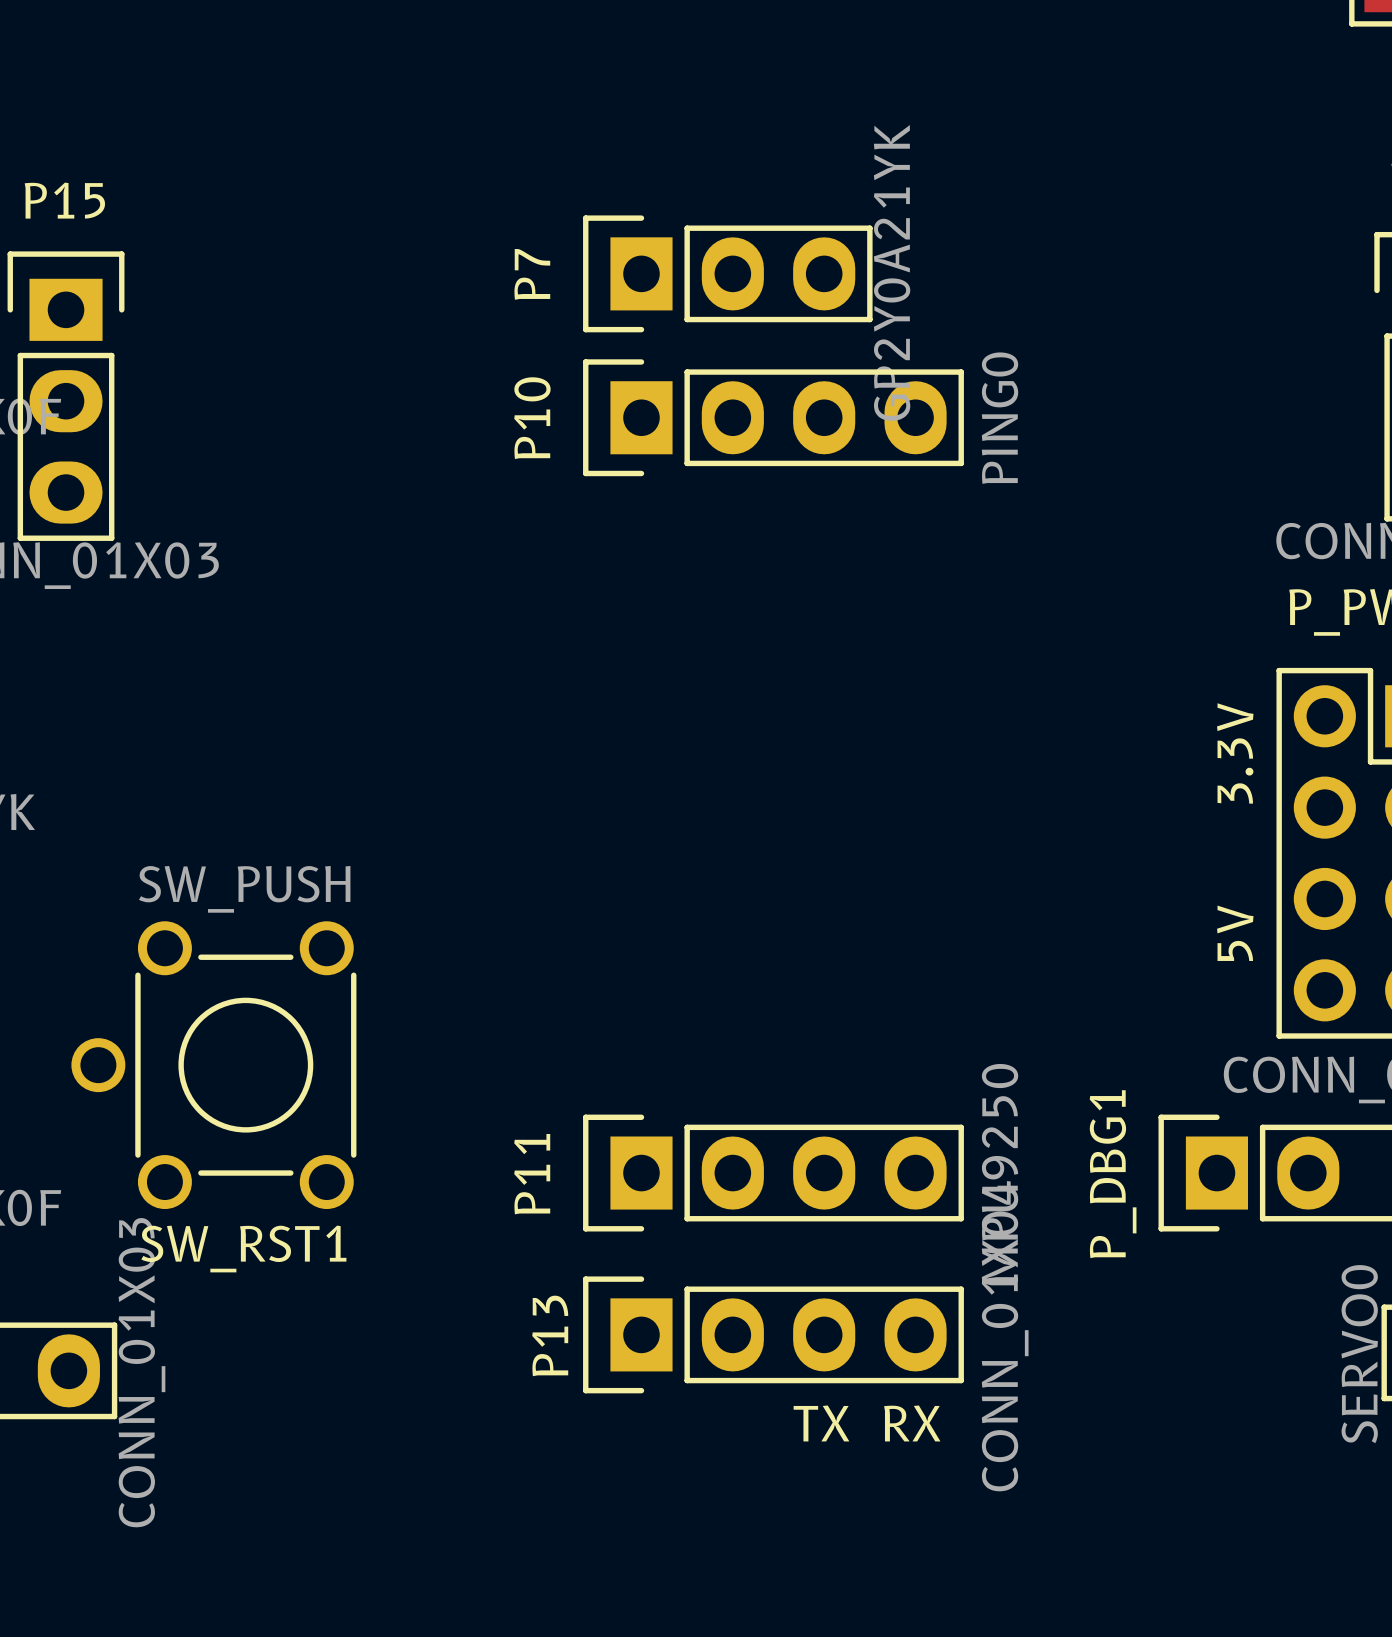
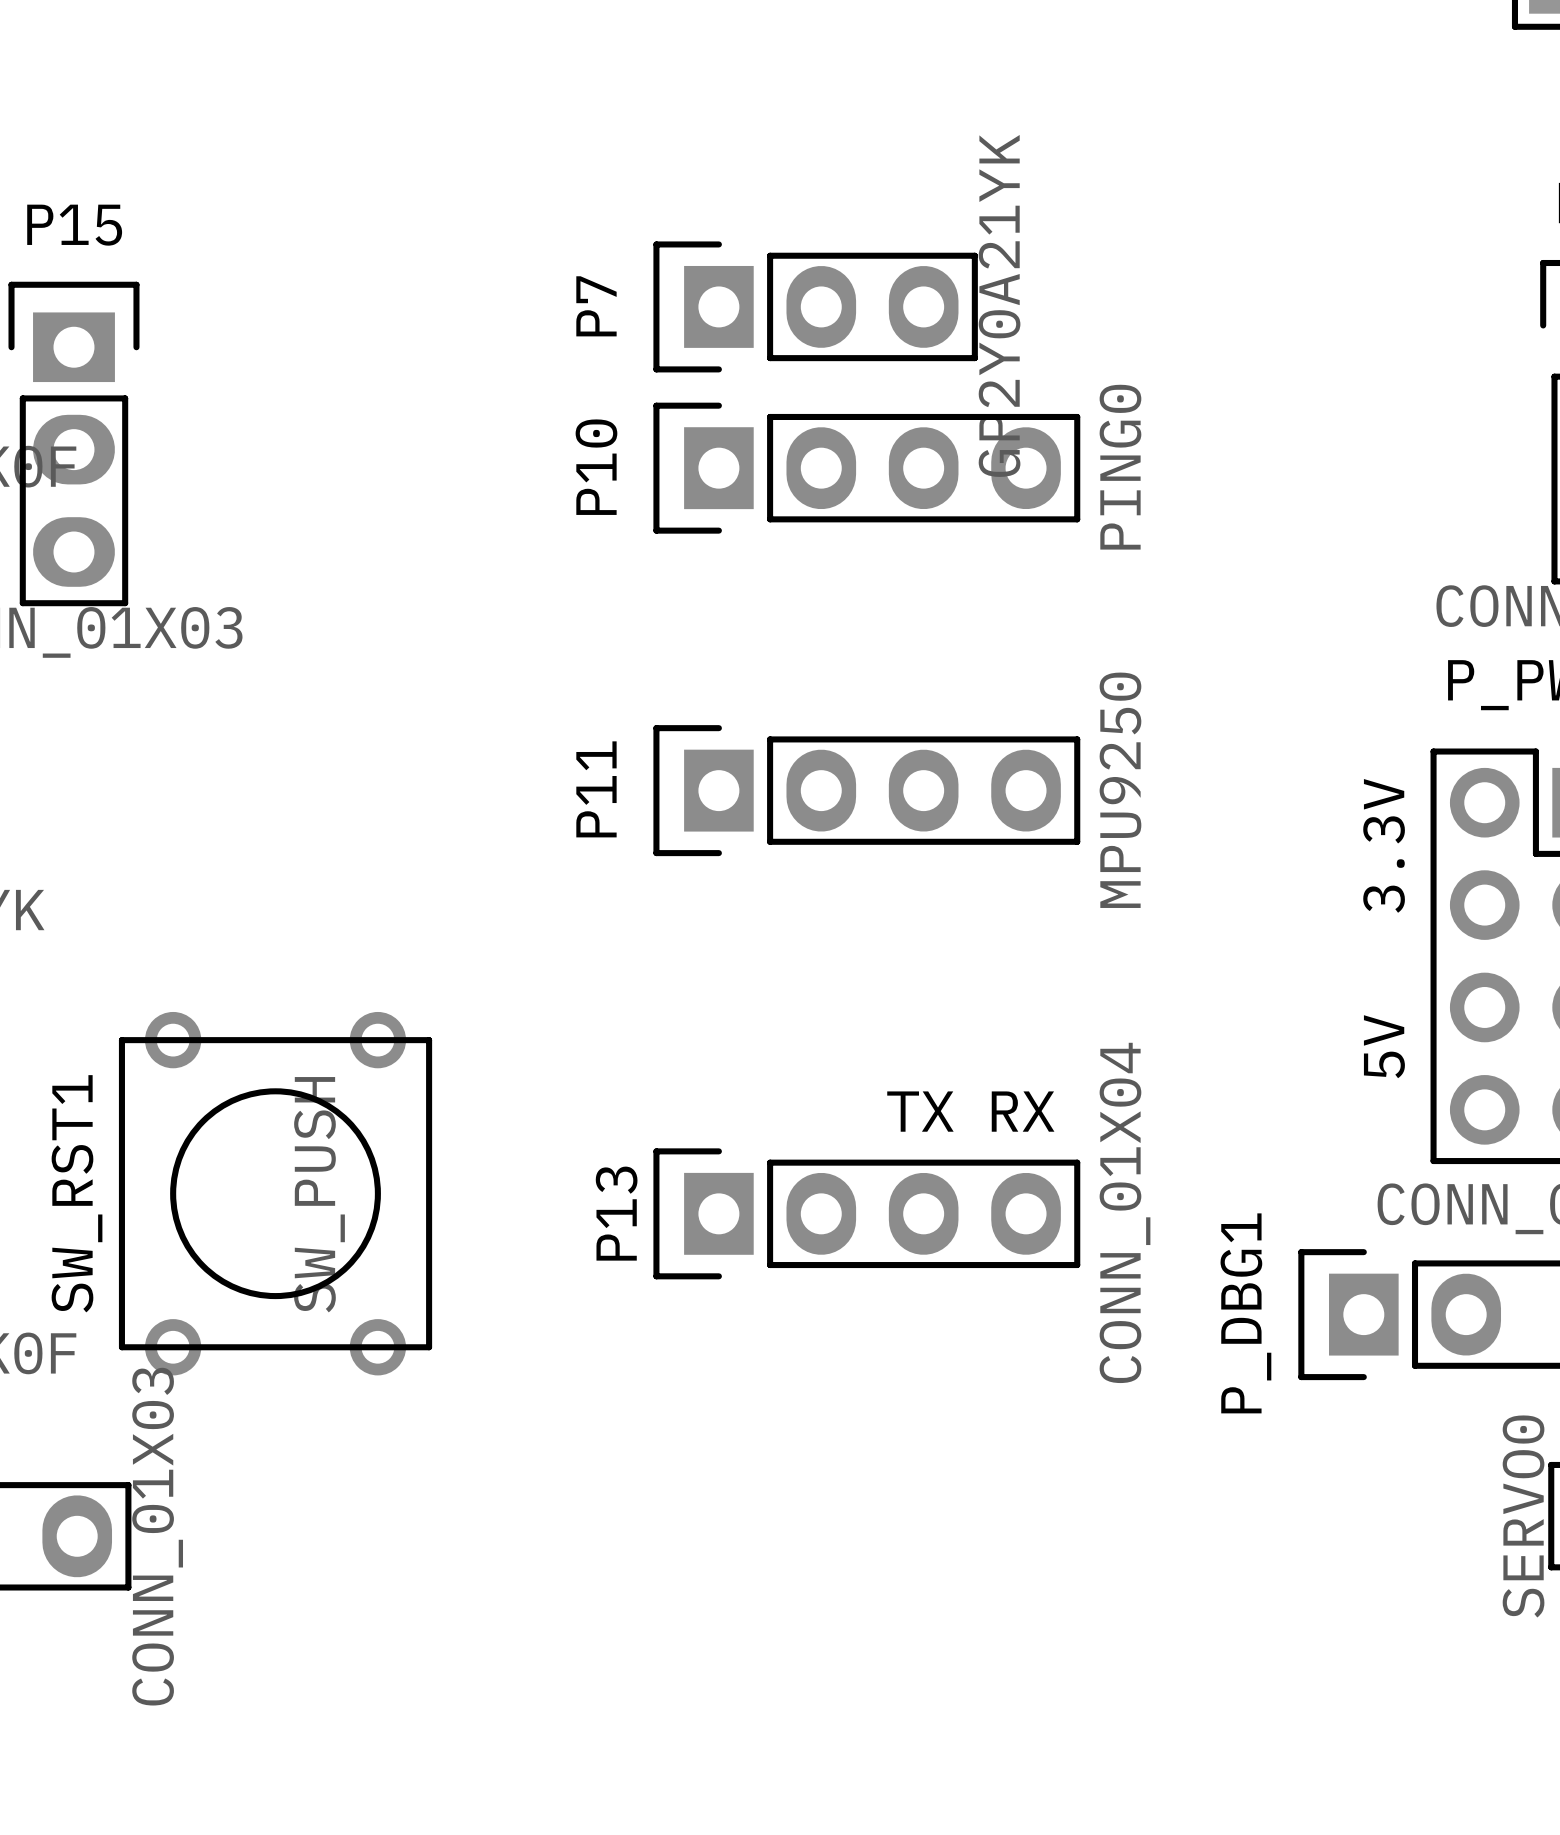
SW_RST1 value position: SW_PUSH (244, 889) -> SW_PUSH (319, 1194)
SW_RST1 footprint: [71, 921, 357, 1210] -> [118, 1011, 433, 1376]
P11 position: (773, 1173) -> (866, 790)
SW_RST1 name position: SW_RST1 (243, 1249) -> SW_RST1 (77, 1193)
P13 position: (773, 1334) -> (866, 1213)
text position: TX (821, 1423) -> TX (920, 1111)
text position: RX (912, 1423) -> RX (1023, 1111)

